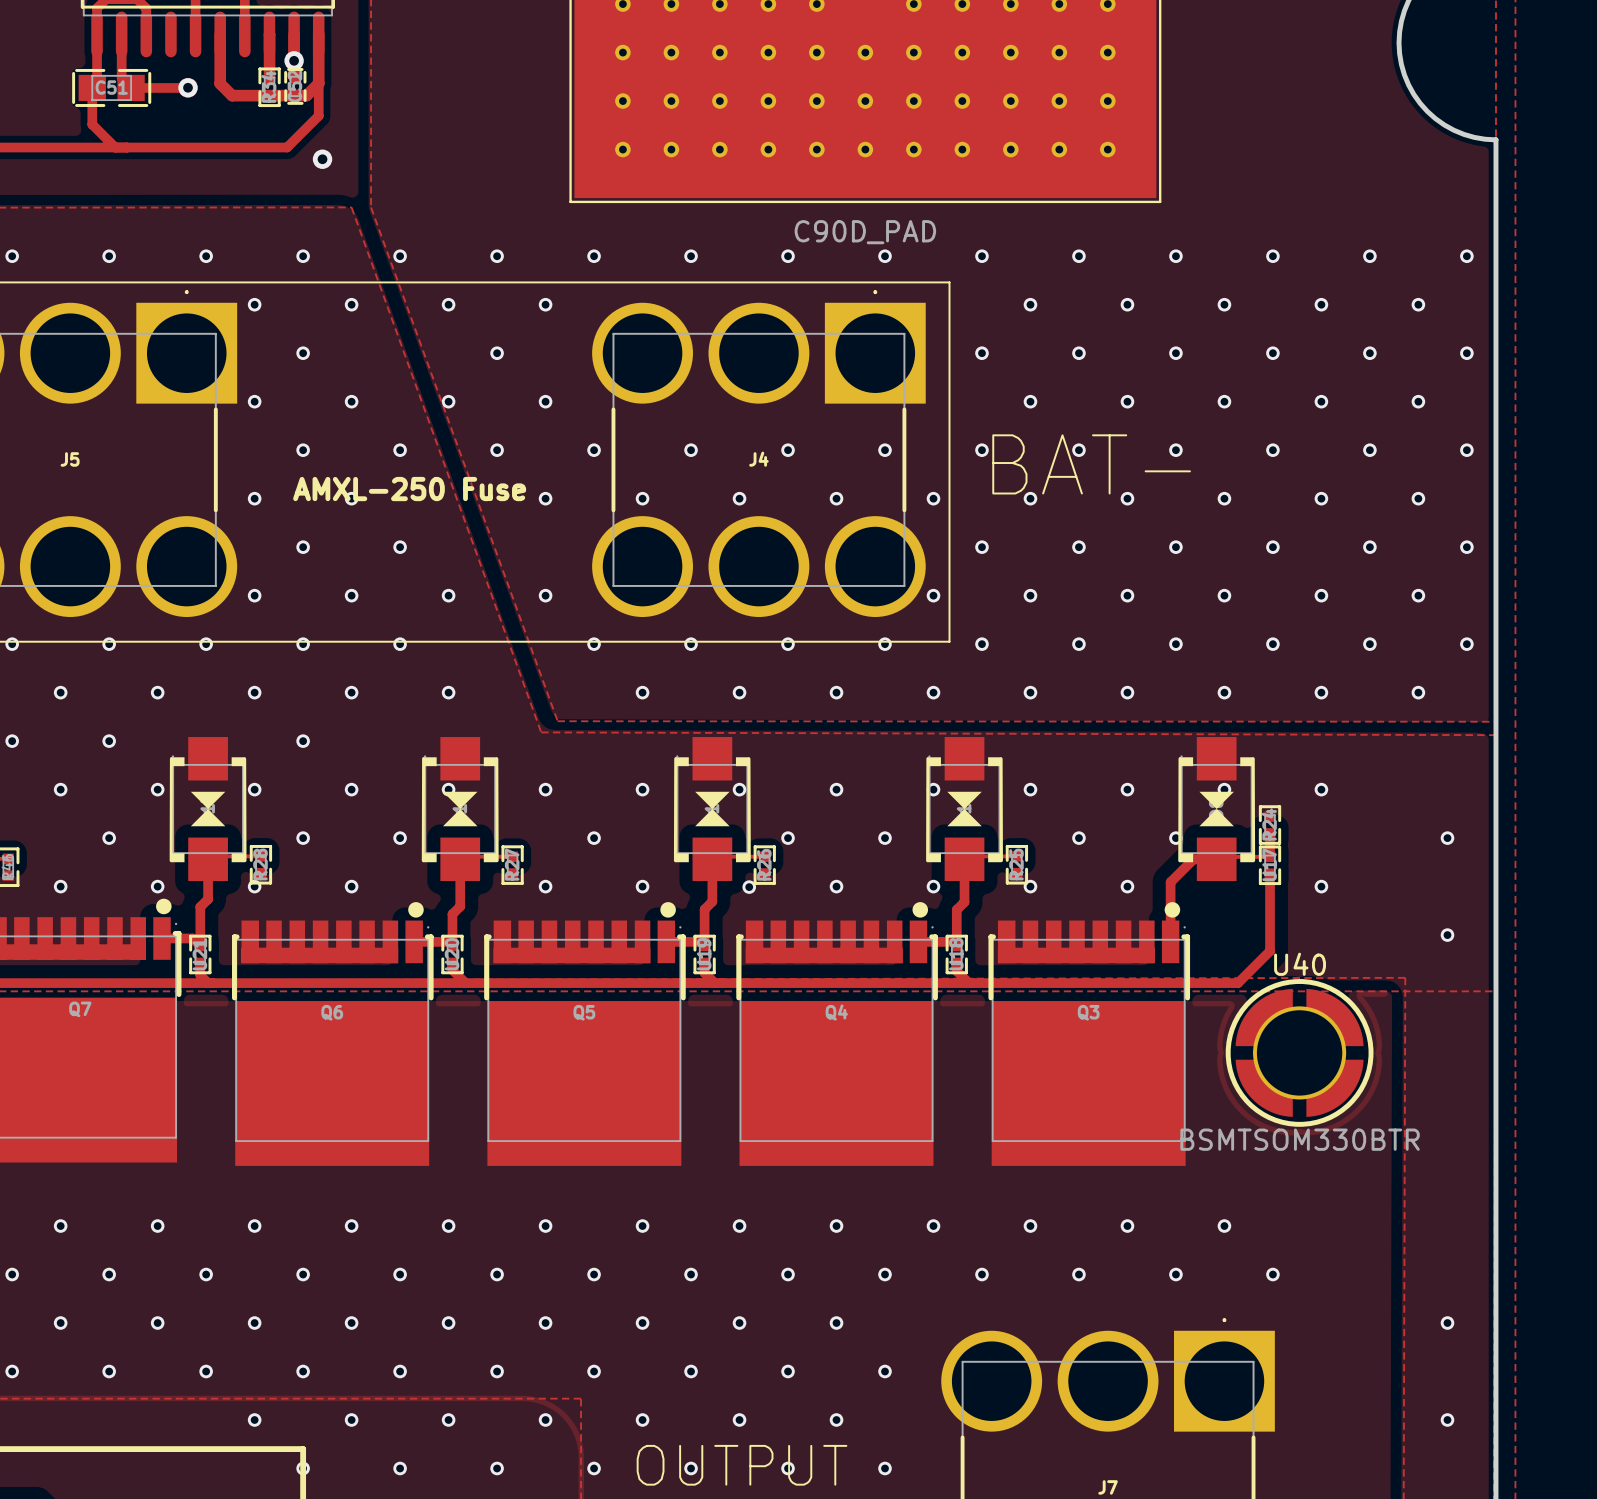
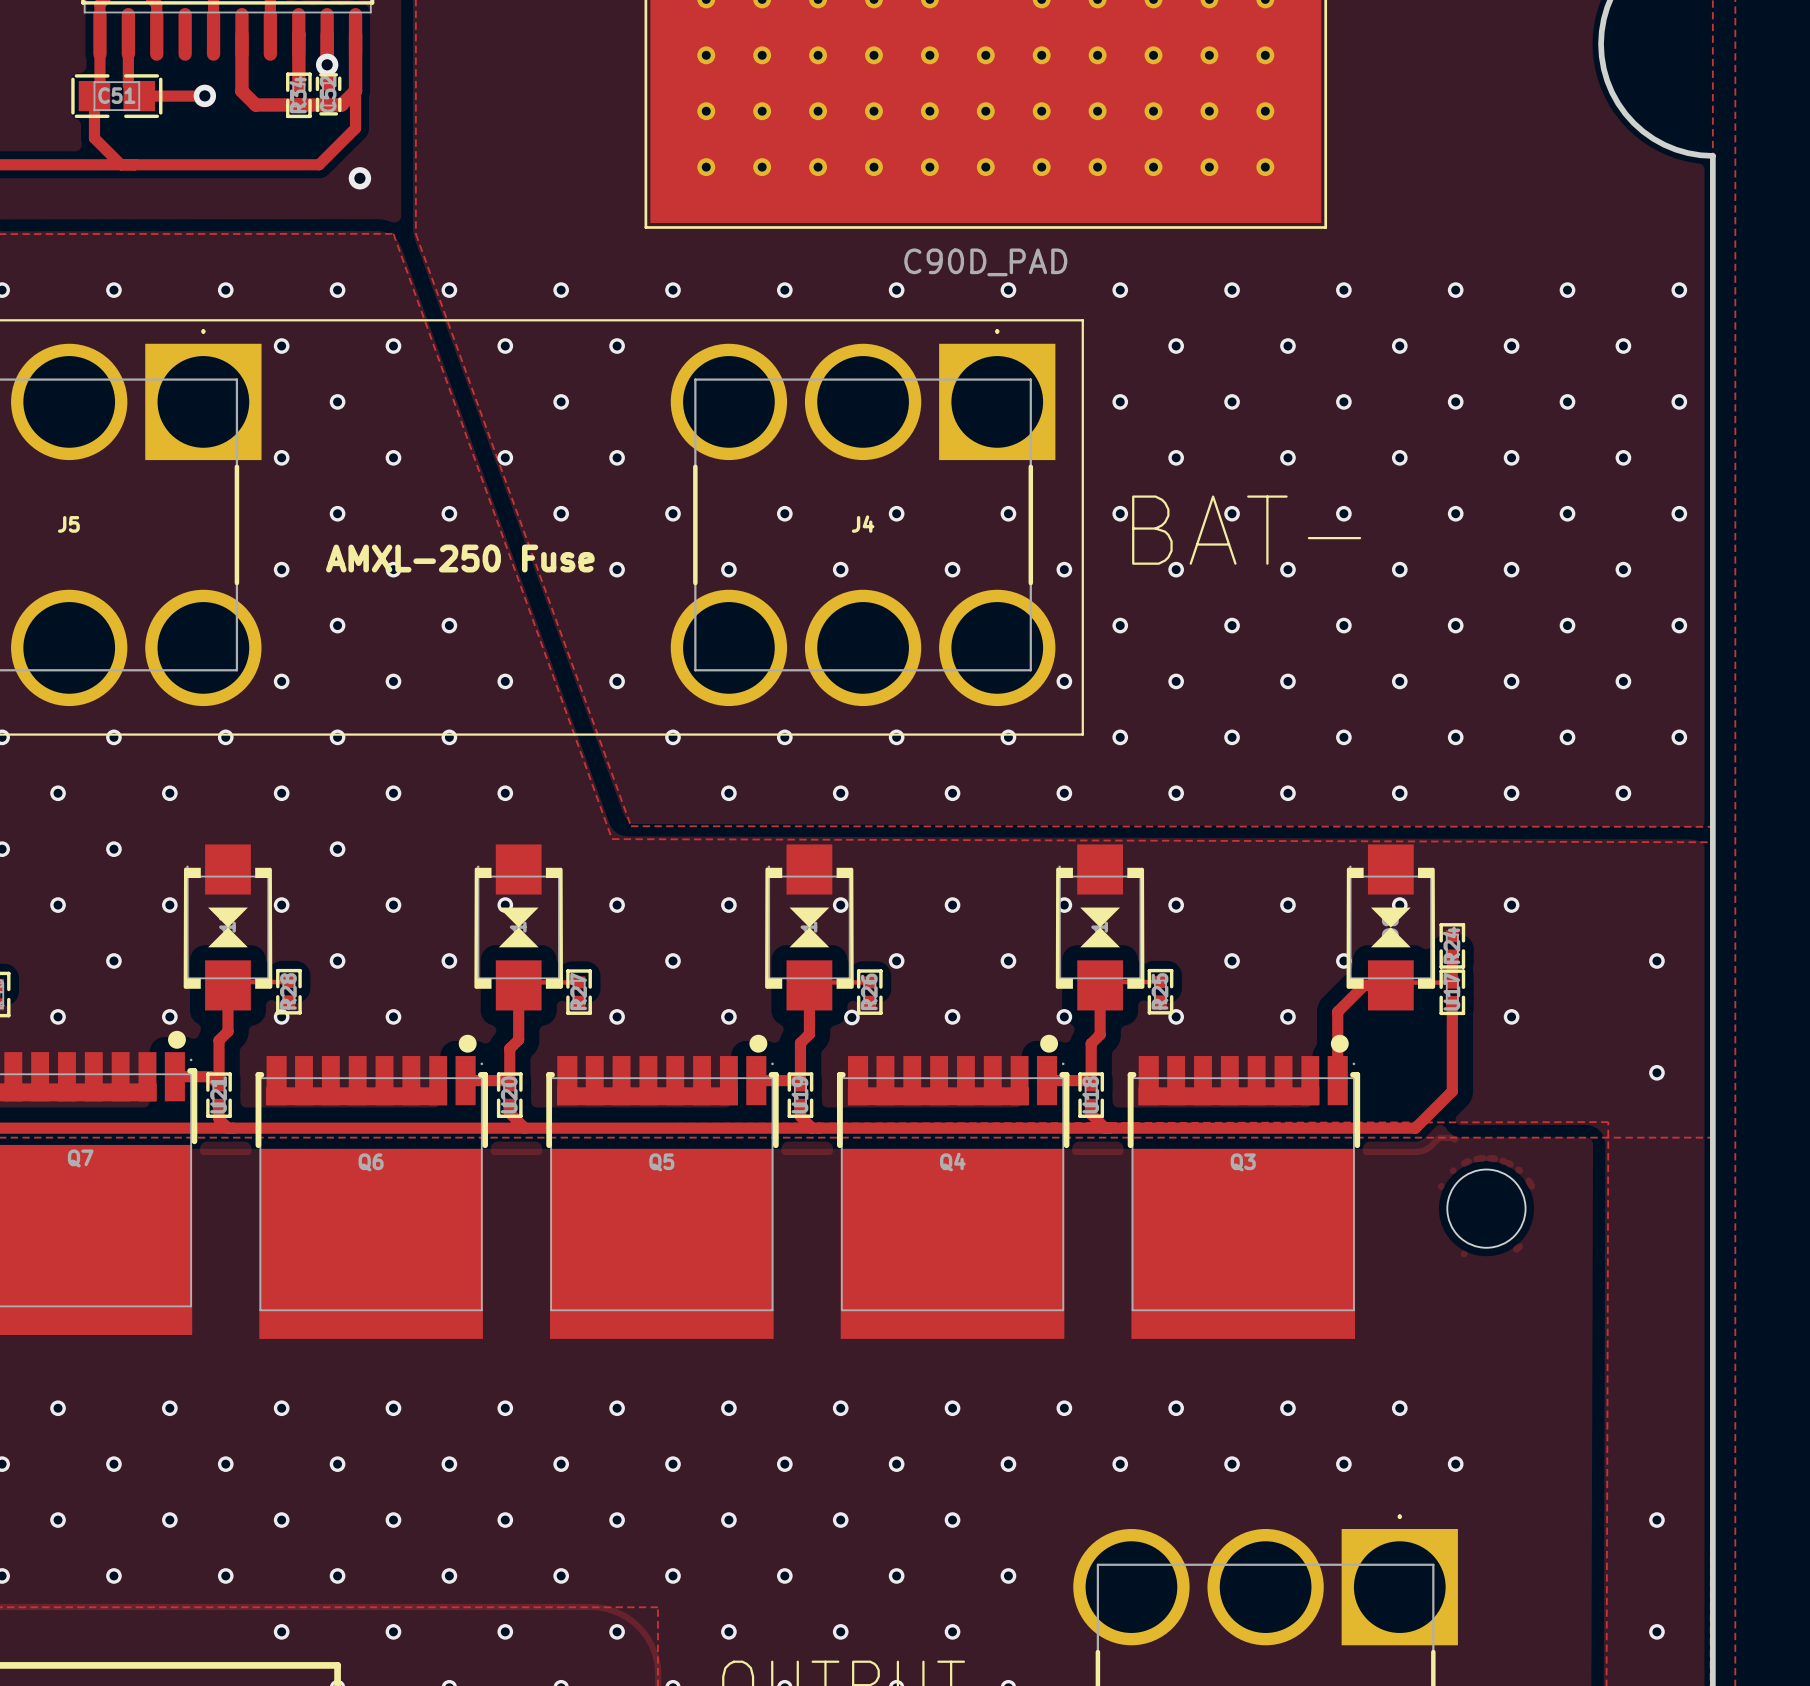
round board edge: none -> [1446, 1168, 1527, 1249]
U40: BSMTSOM330BTR (1299, 1052) -> none

